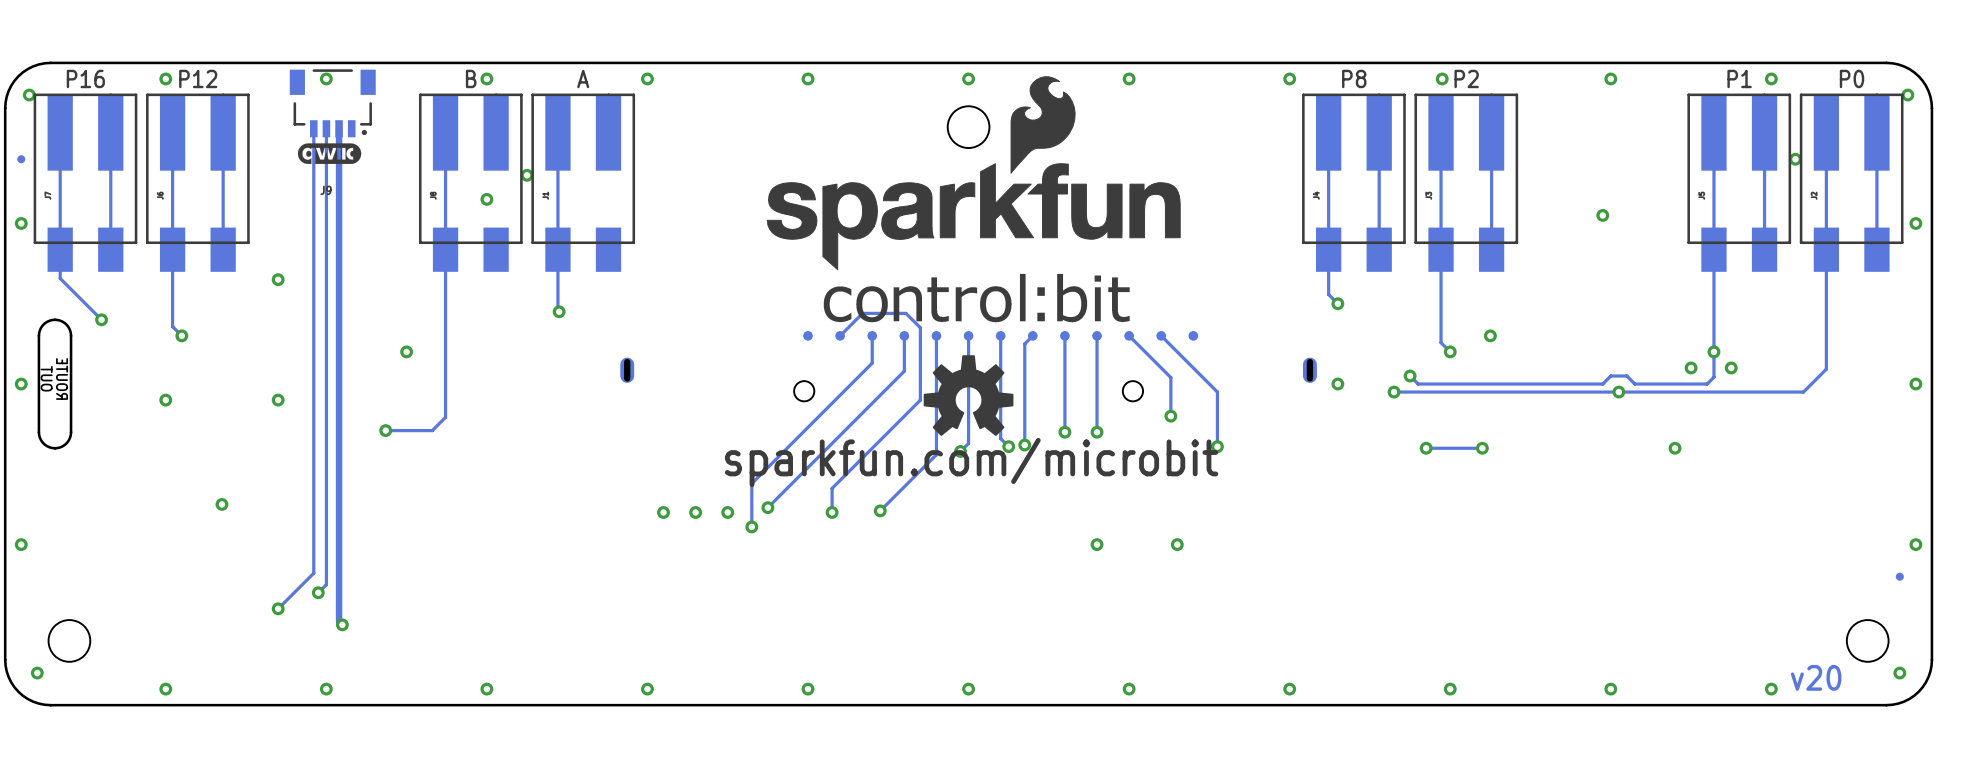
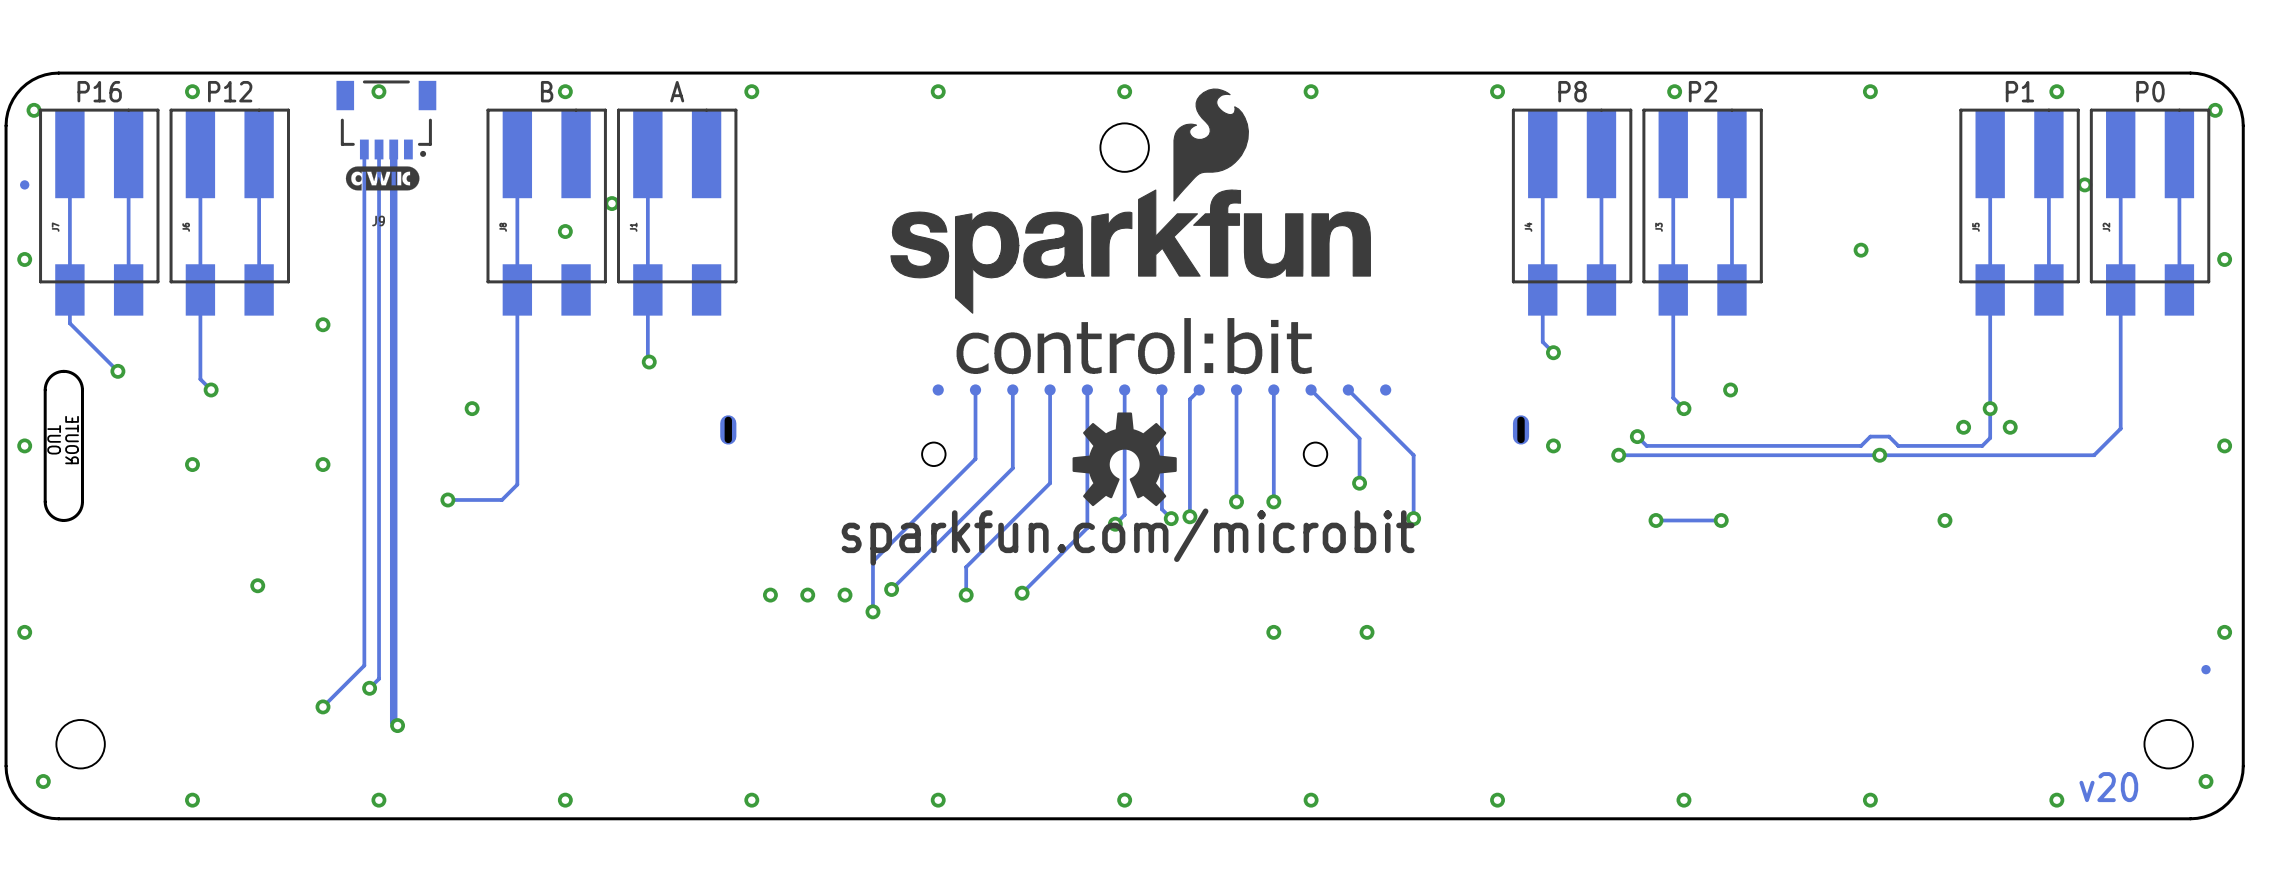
track: (840, 335) (862, 313) (905, 313) (920, 327) (920, 400) (904, 416) -> (1050, 431) (1050, 483)
track: (872, 363) (840, 395) -> (975, 389) (975, 458)
track: (904, 371) (872, 403) -> (1012, 421) (1012, 468)

